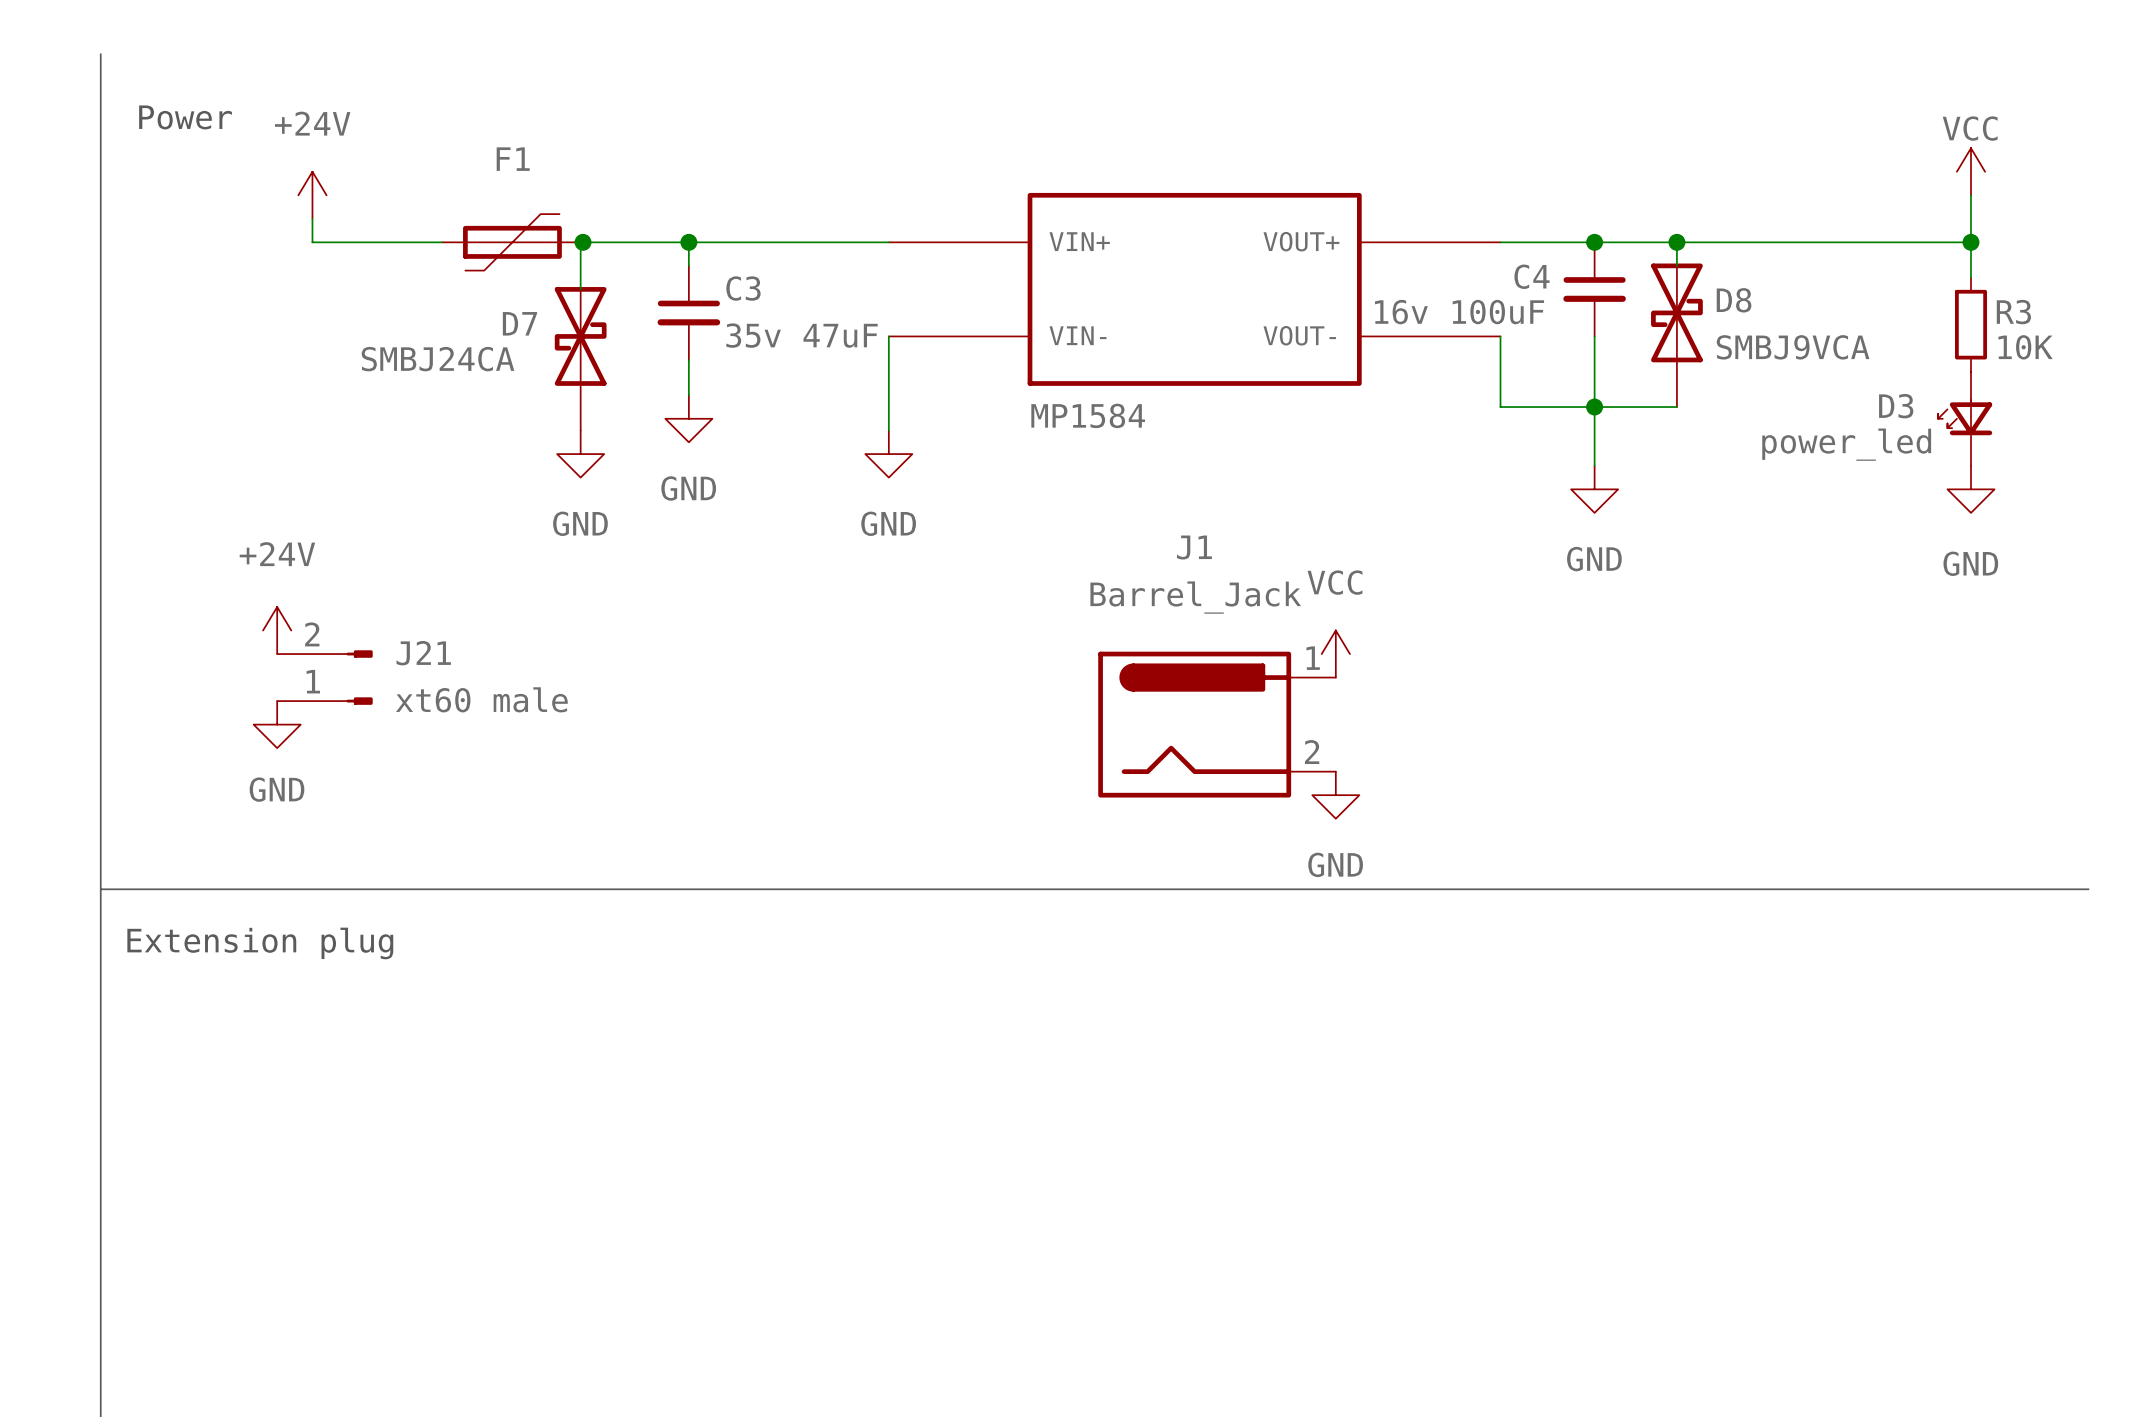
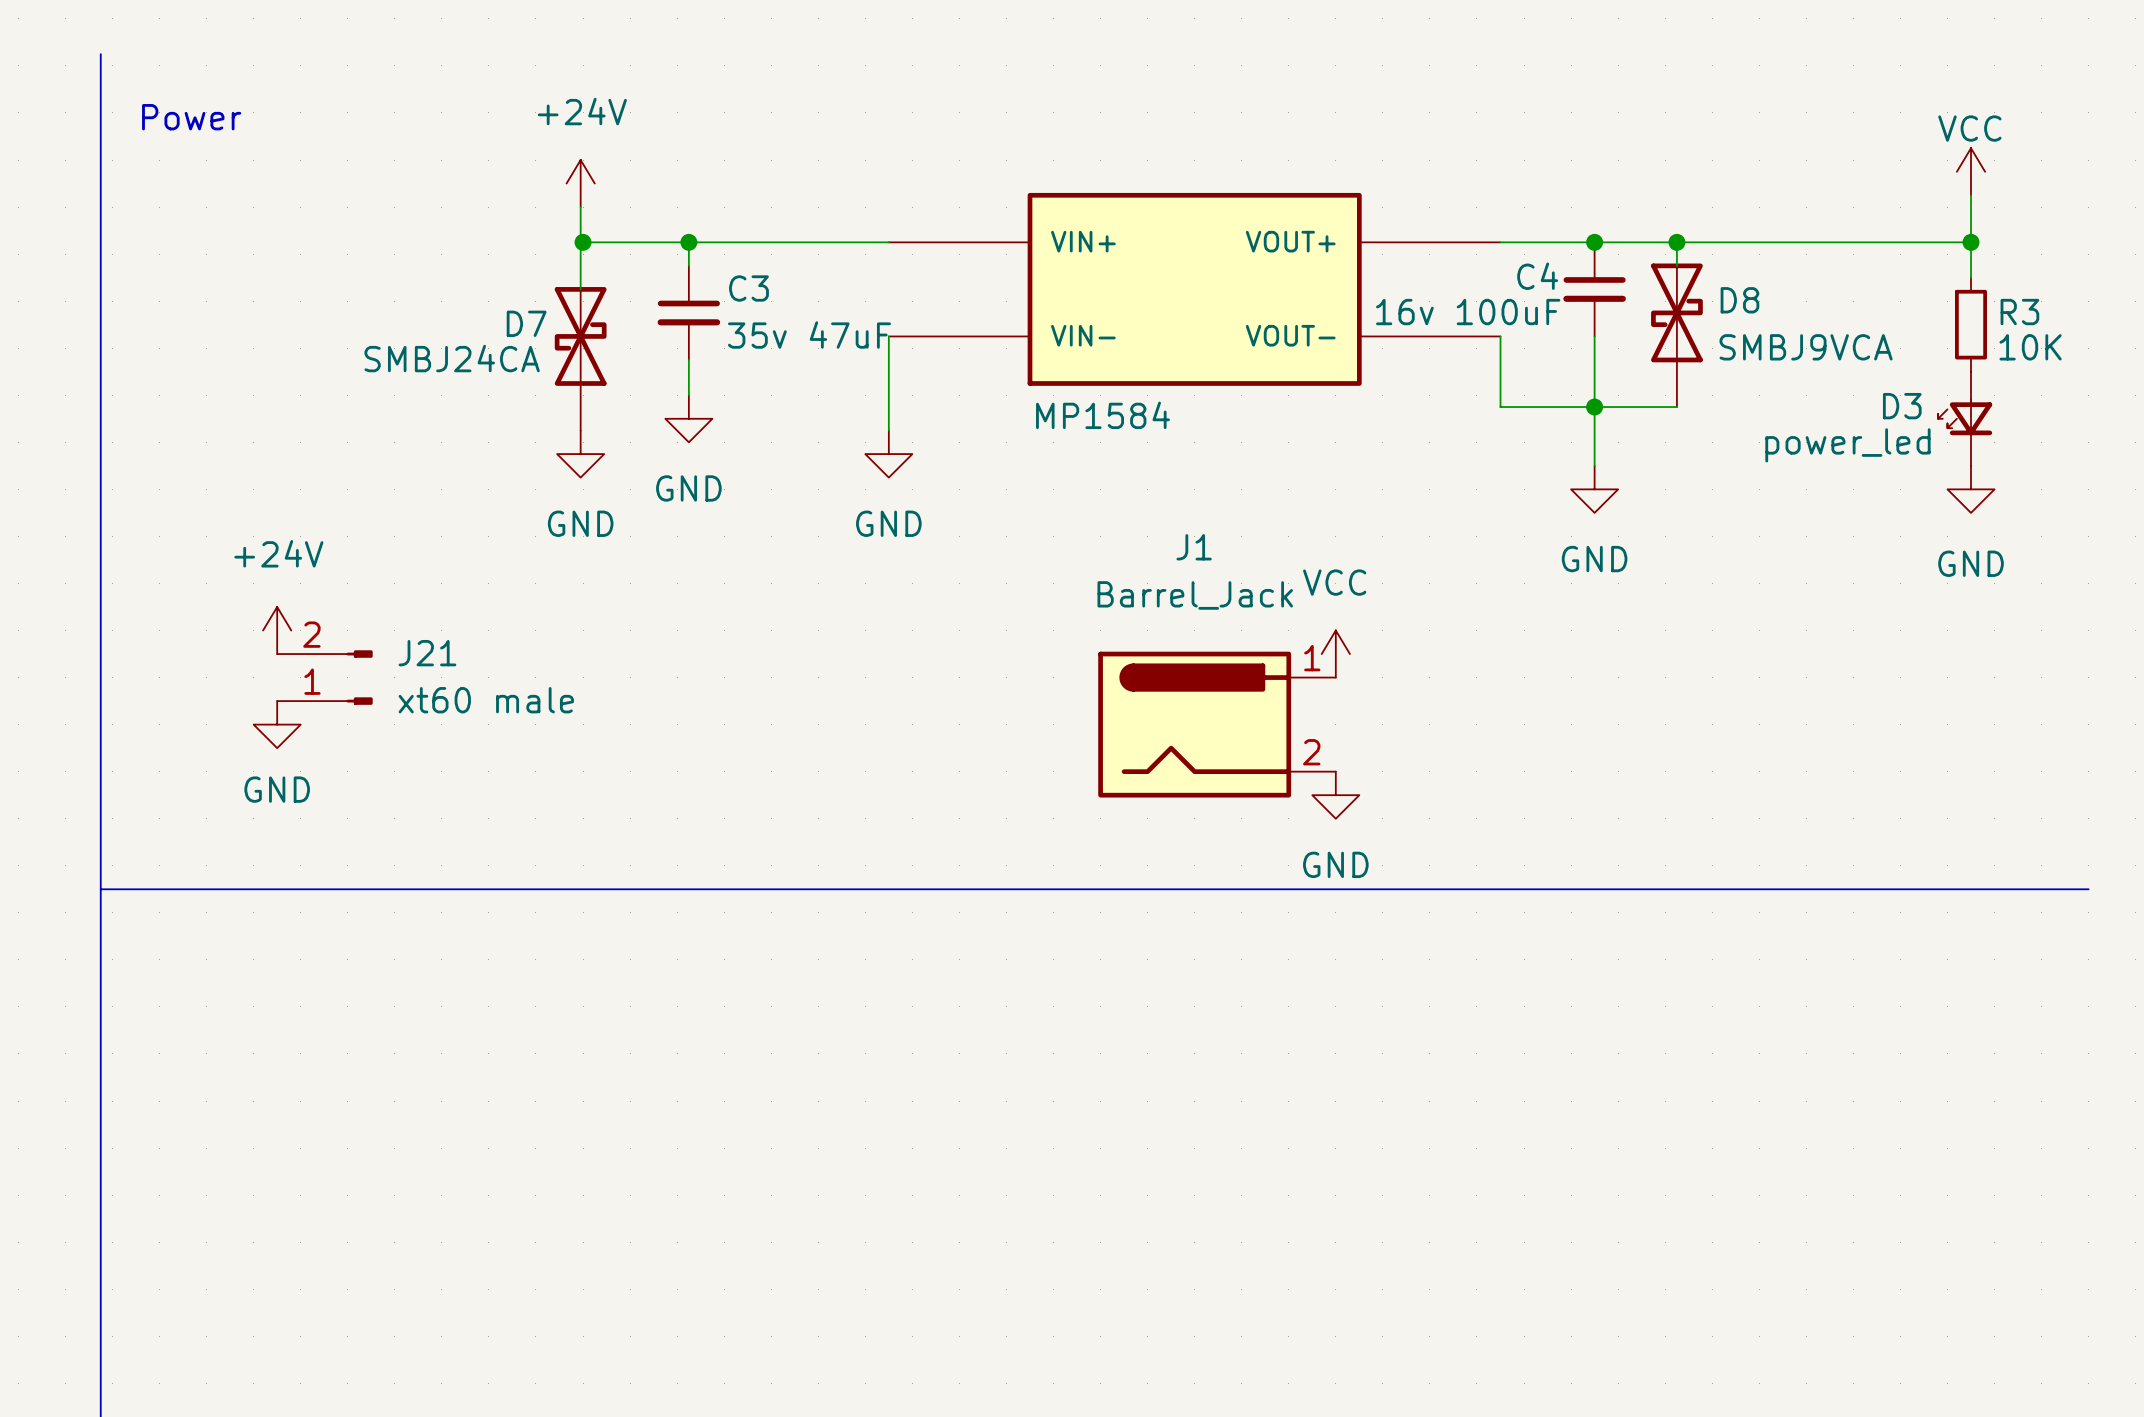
power symbol position: +24V (312, 195) -> +24V (580, 183)
wire: none -> (580, 207) (580, 242)
wire: (312, 218) (312, 242) (441, 242) -> none
F1: (512, 242) -> none
text: Extension plug (260, 943) -> none

